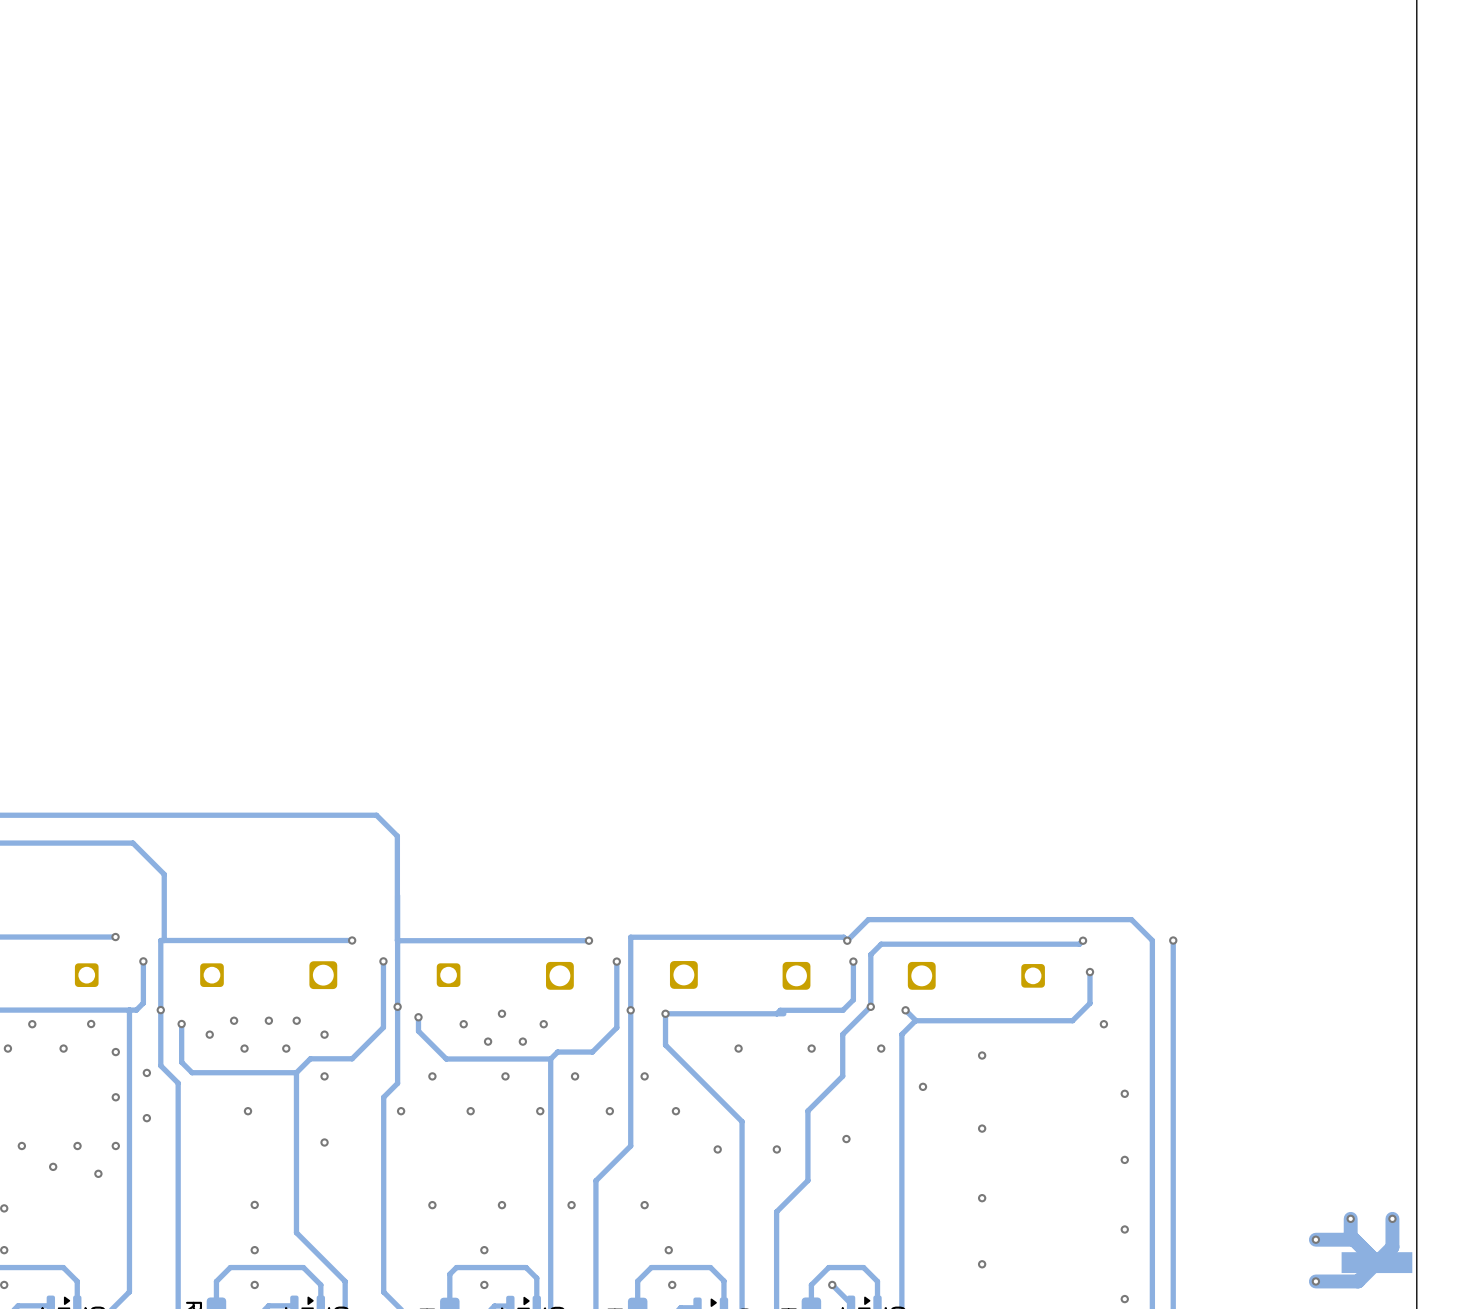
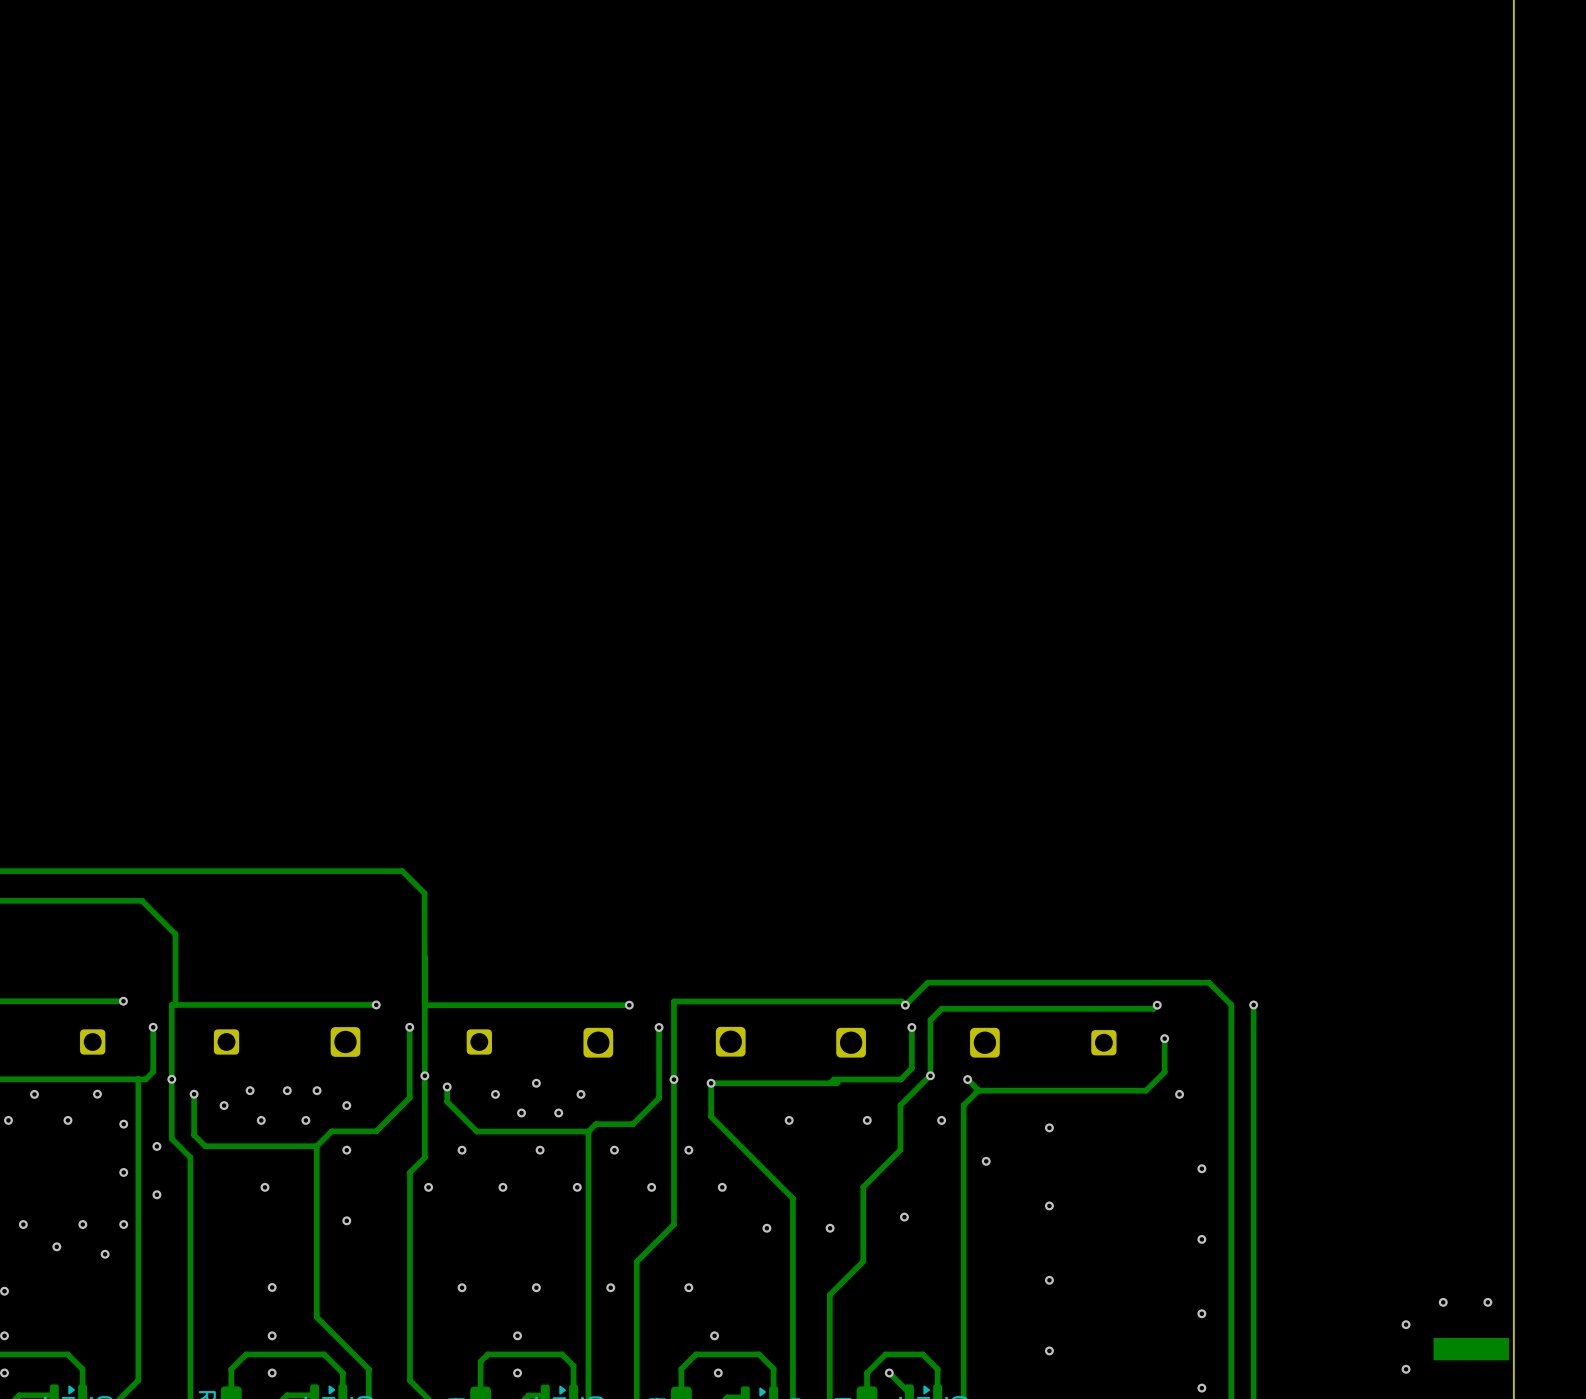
track: (1350, 1218) (1350, 1236) (1376, 1262) -> none
track: (1392, 1218) (1392, 1247) (1358, 1281) (1315, 1281) -> none
track: (1354, 1239) (1315, 1239) -> none

